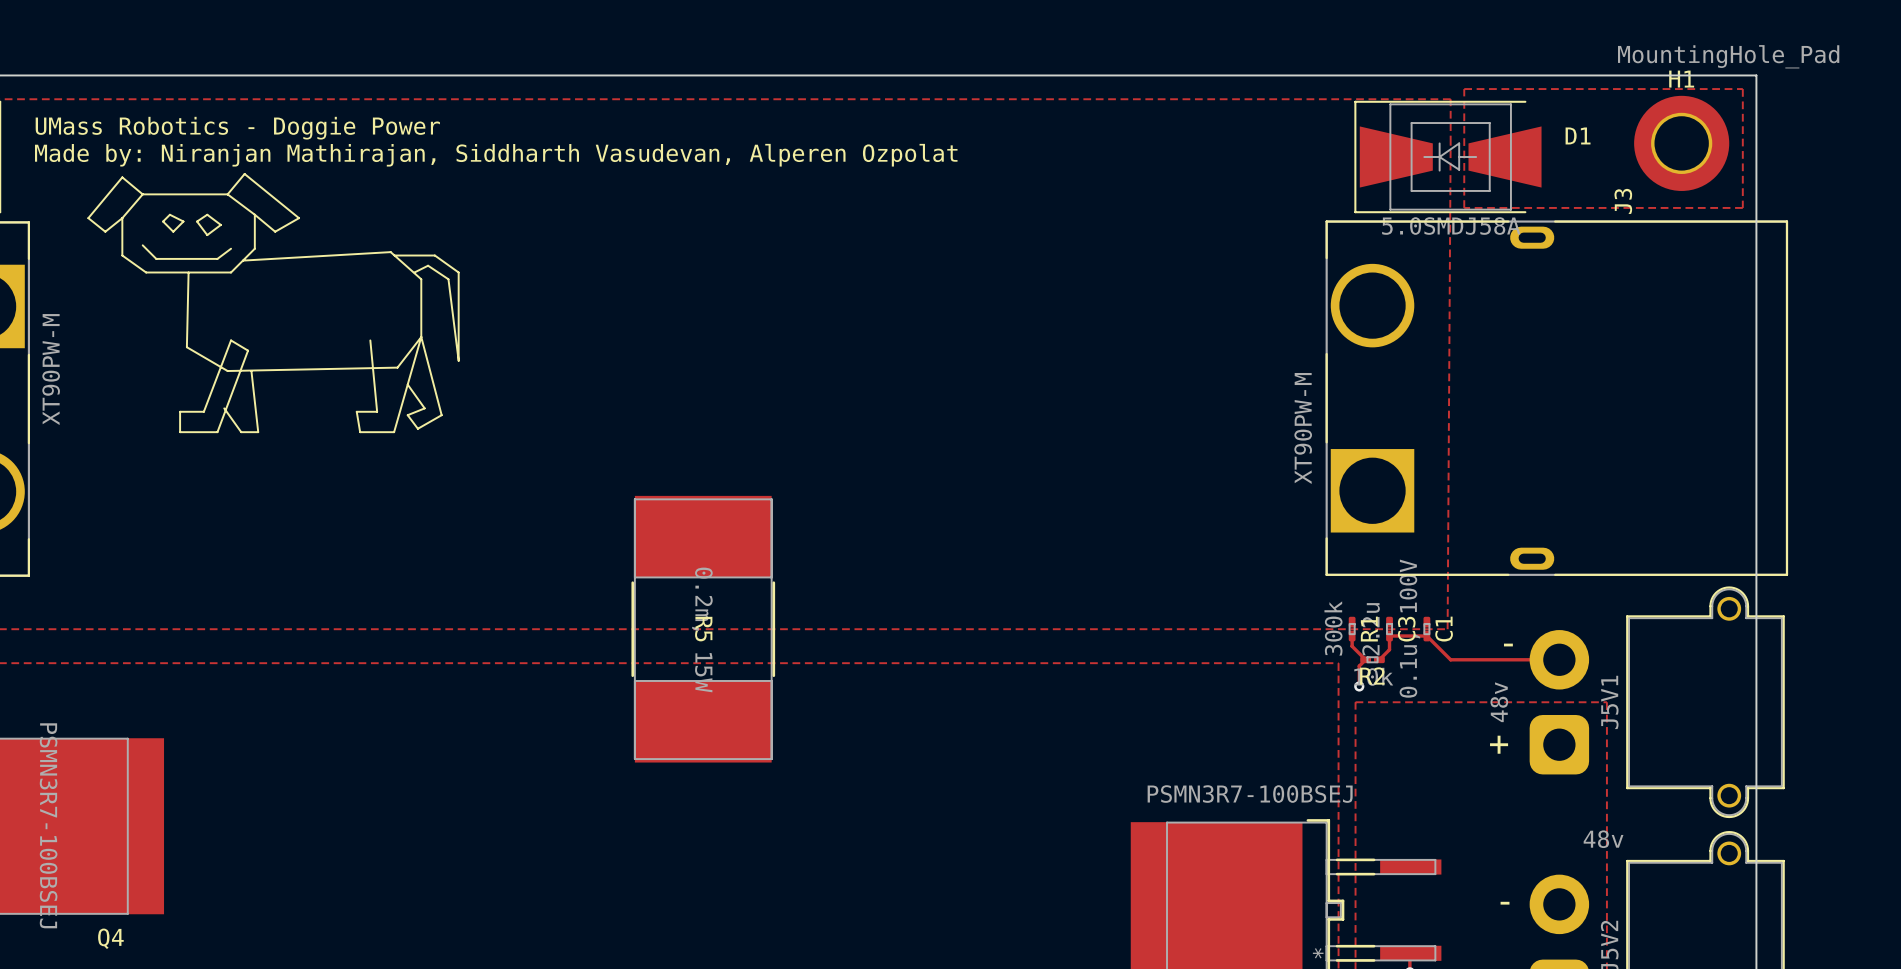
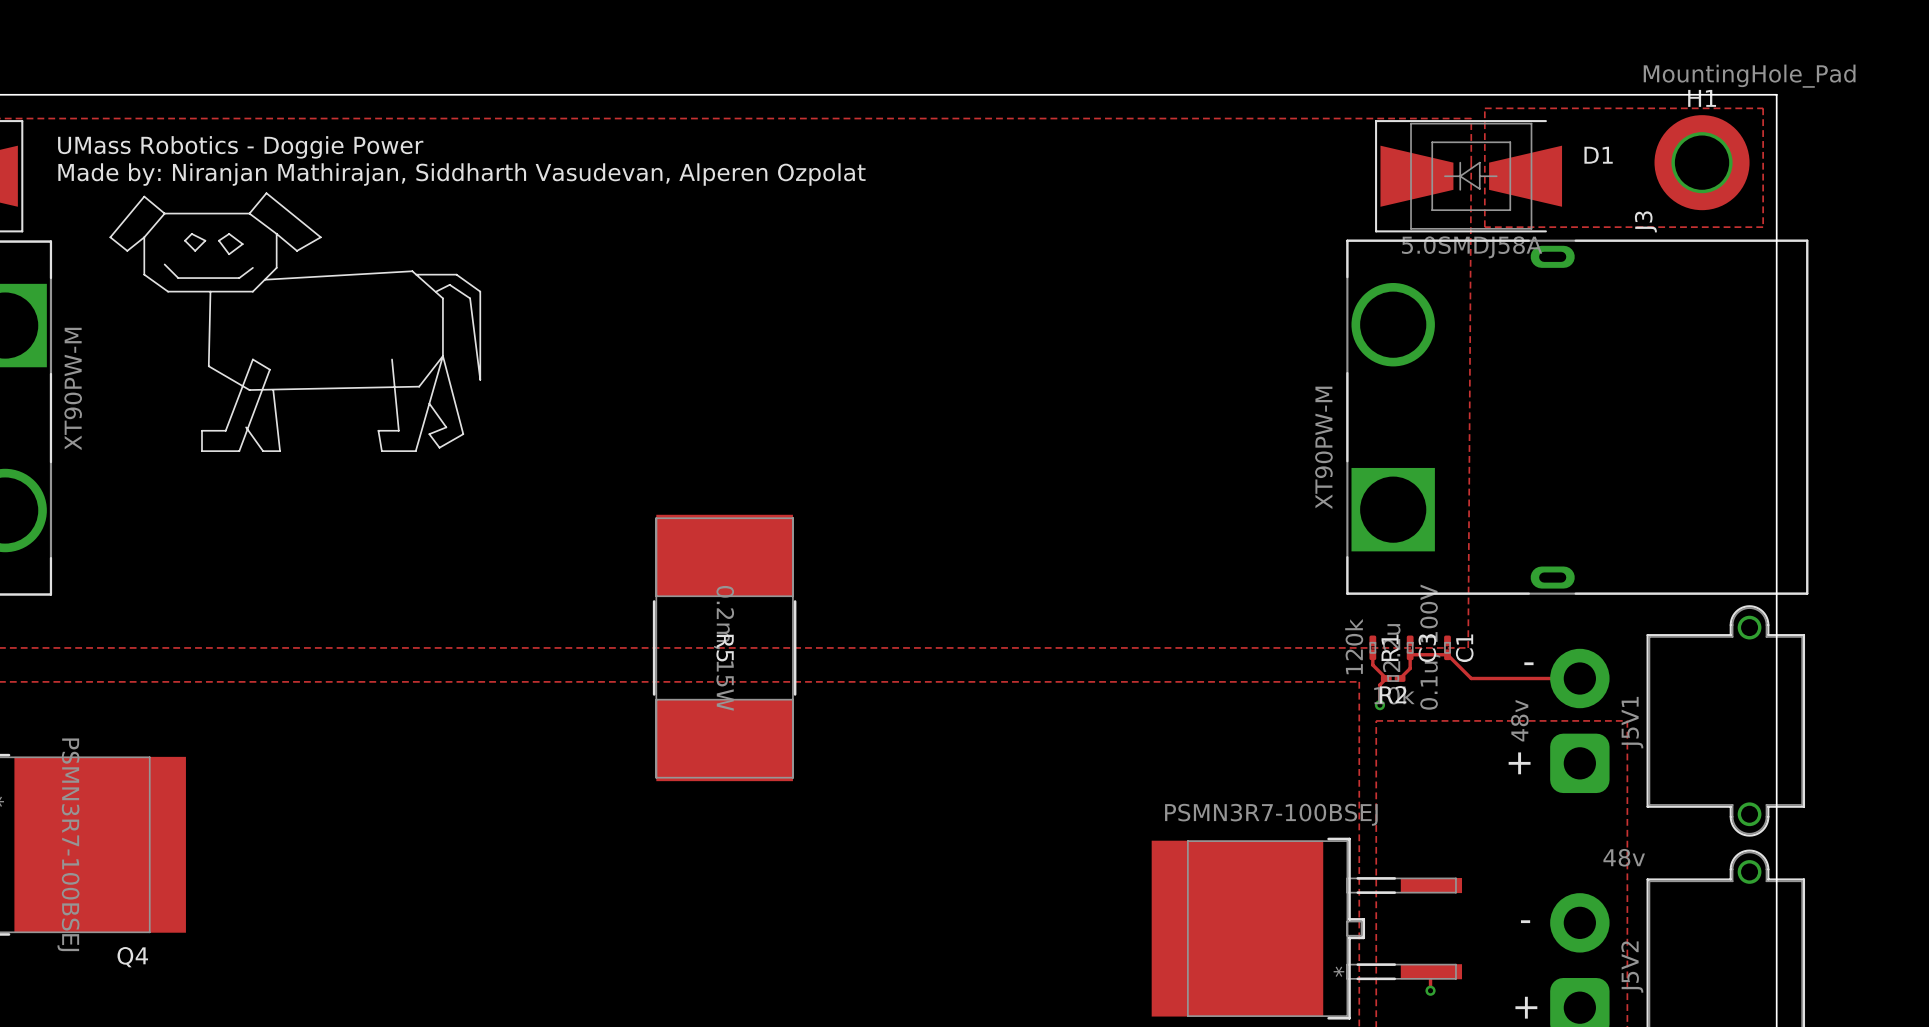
R1 value: 300k (1333, 628) -> 120k (1354, 646)

